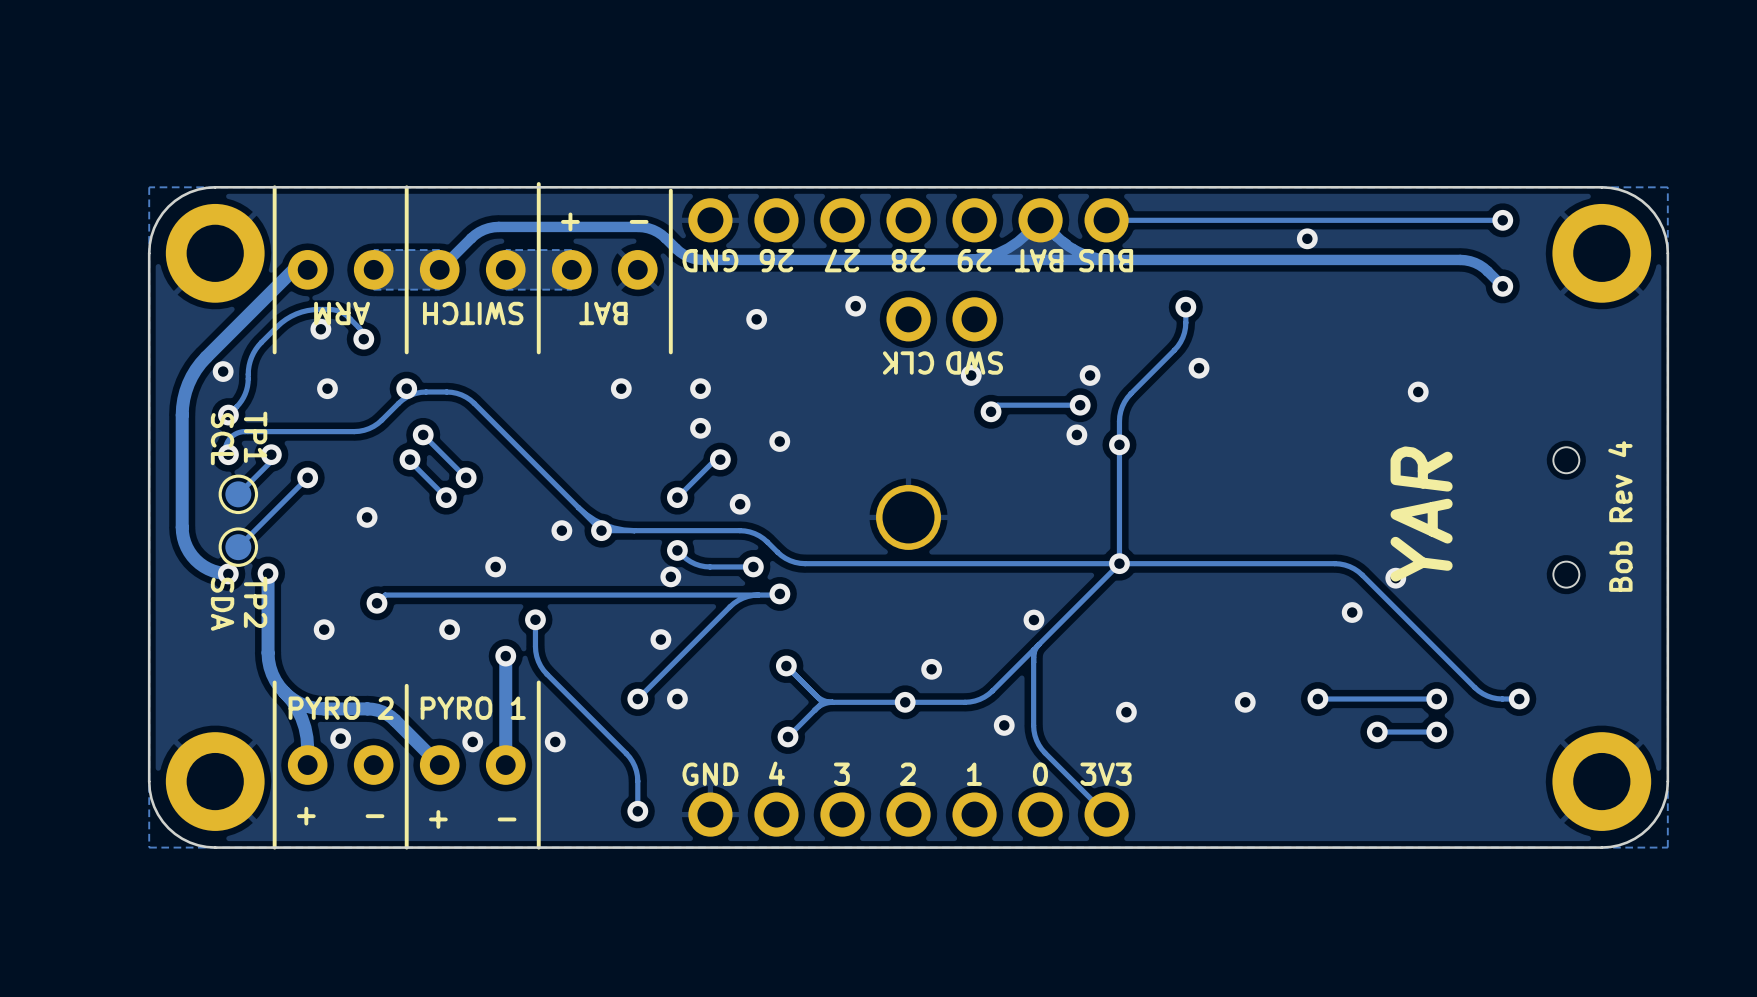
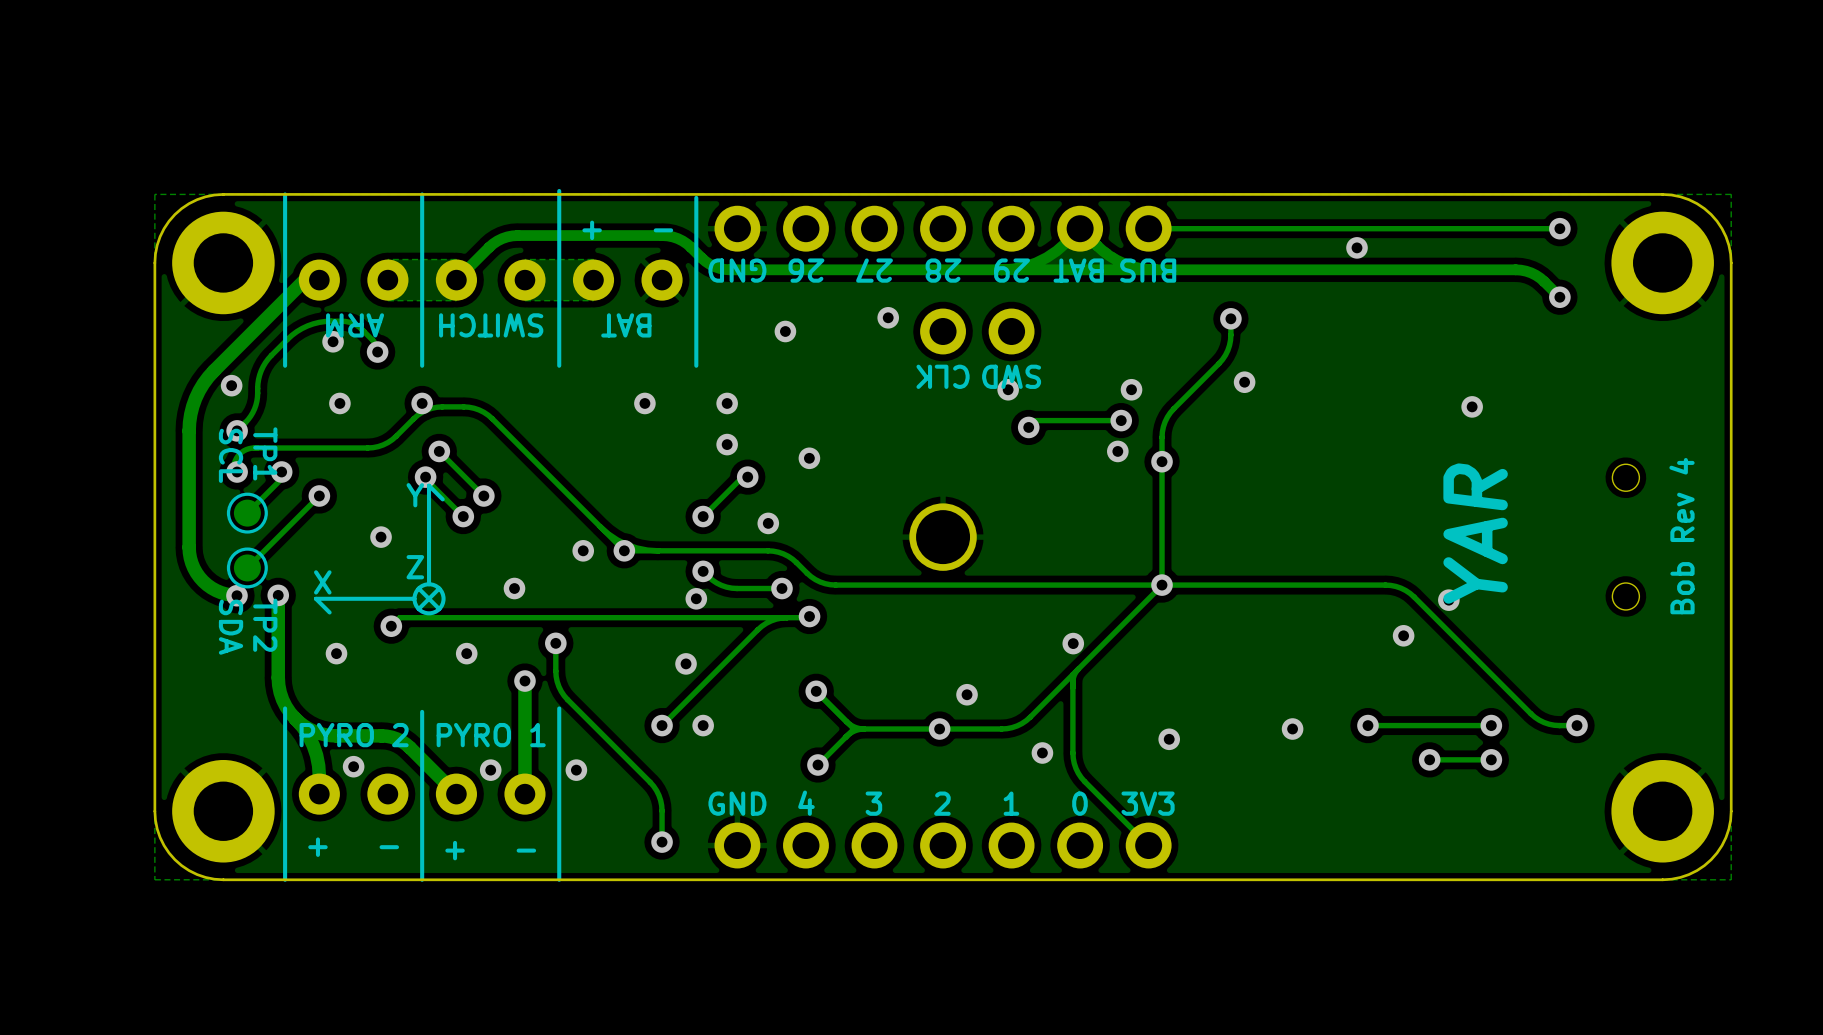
text: none -> Y (415, 495)
line: none -> (442, 499) (429, 485) (429, 584)
text: none -> Z (415, 567)
drawing: none -> [412, 582, 446, 616]
text: none -> X (322, 582)
line: none -> (418, 588) (439, 609)
line: none -> (439, 588) (418, 609)
line: none -> (414, 598) (315, 598) (329, 612)

